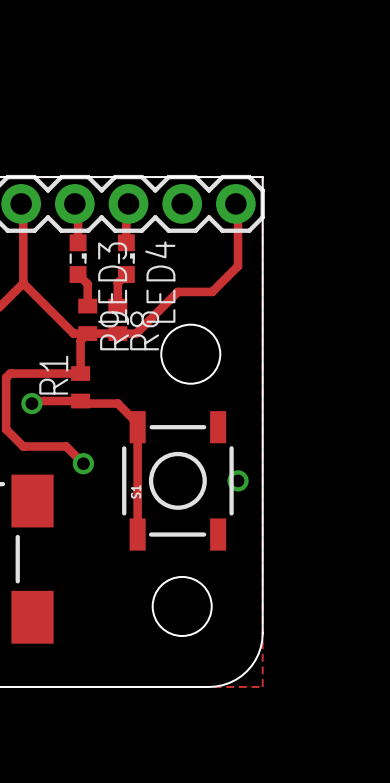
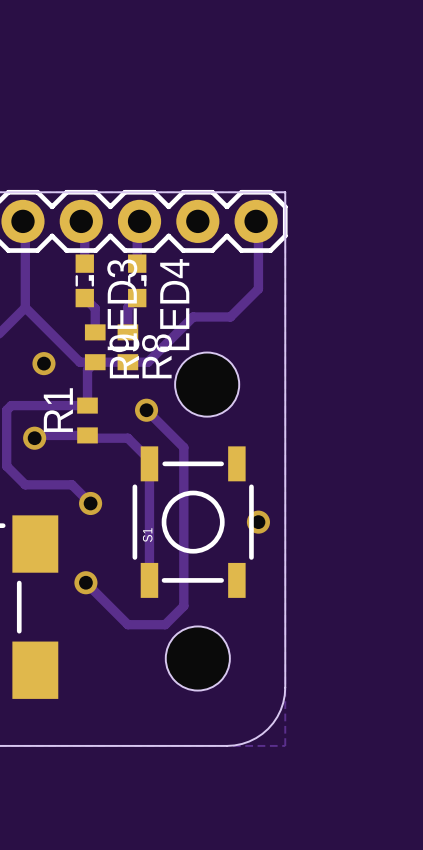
via: none -> (43, 363)
track: none -> (146, 410) (183, 447) (183, 606) (165, 624) (127, 624) (85, 582)
via: none -> (146, 410)
via: none -> (85, 582)

